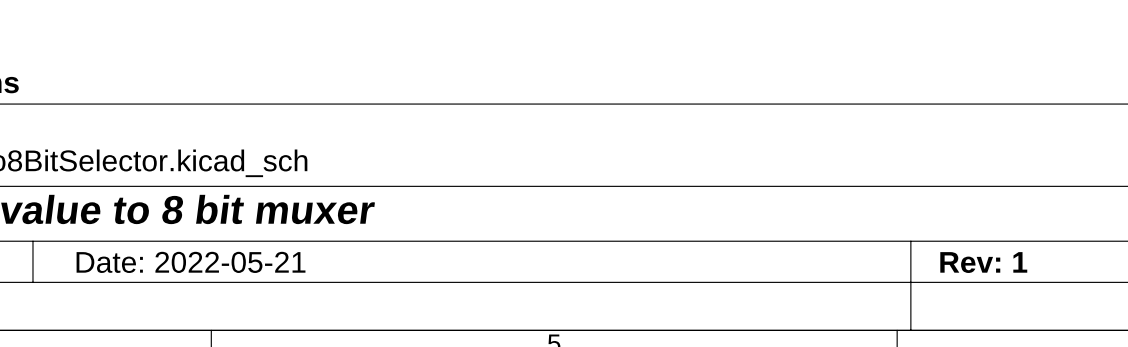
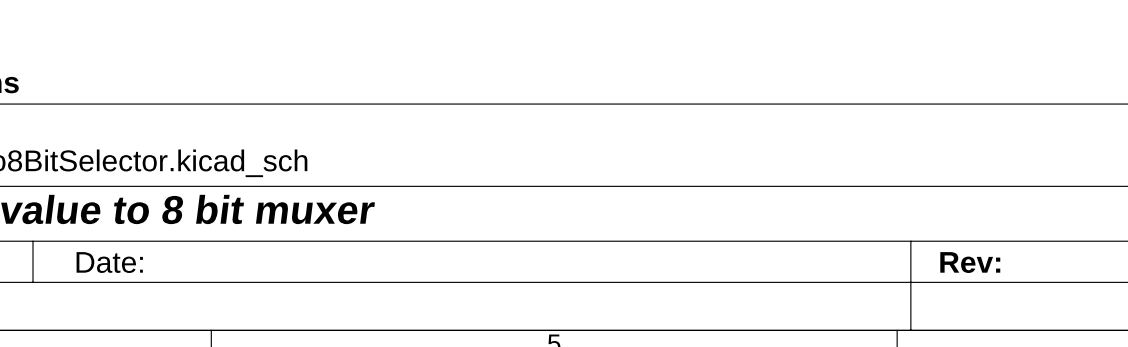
title block: Date: 2022-05-21 (191, 262) -> Date: (109, 262)
title block: Rev: 1 (983, 262) -> Rev: (970, 262)

